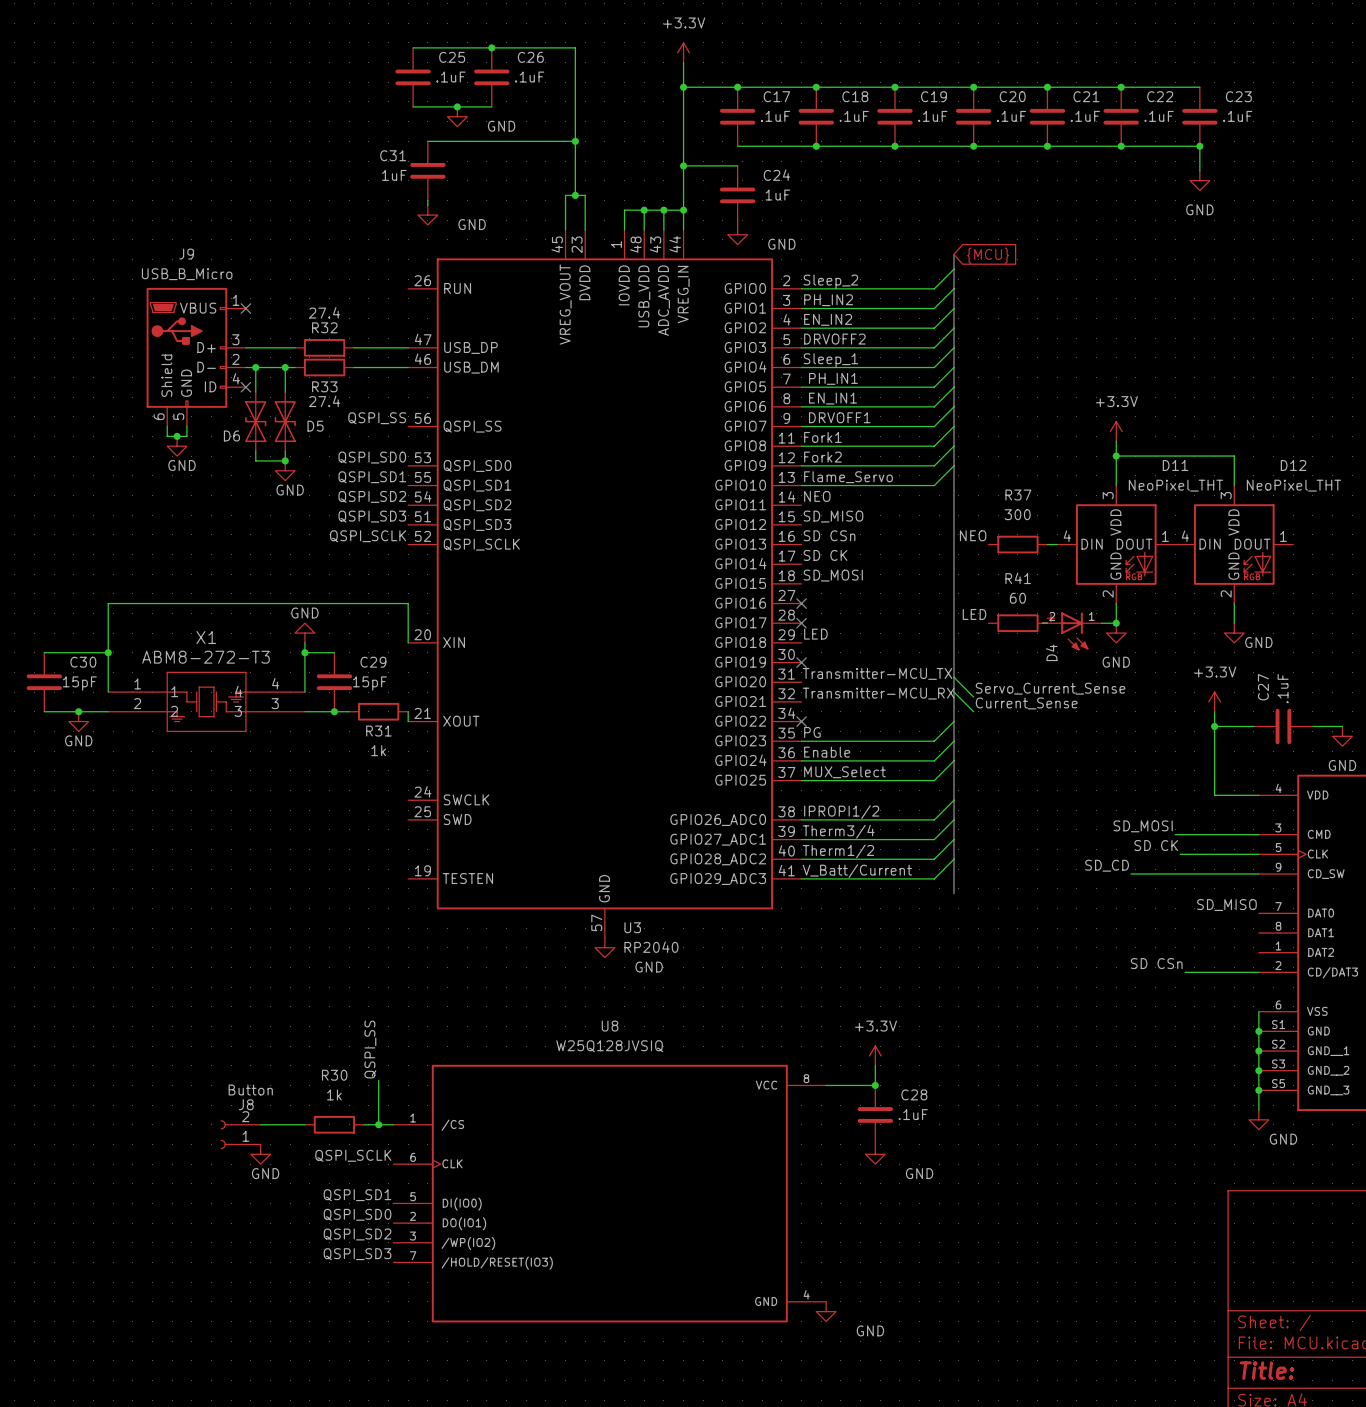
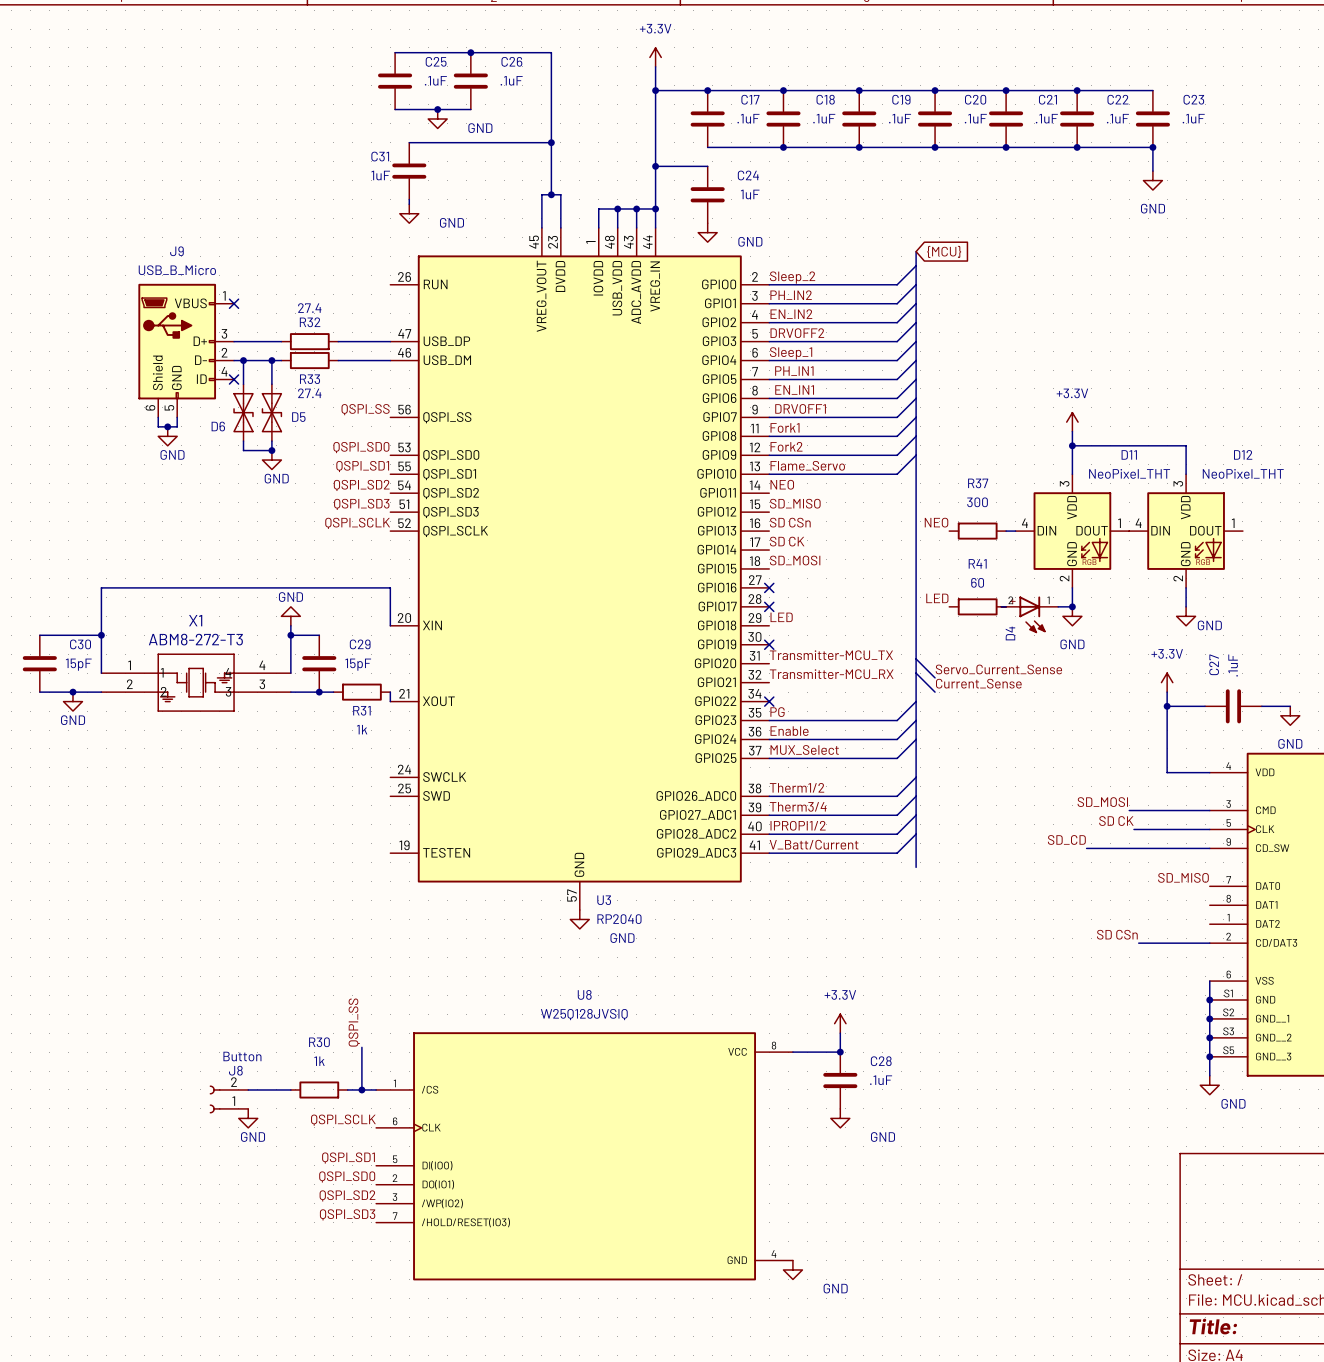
label: IPROPI1/2 (841, 812) -> Therm1/2 (797, 787)
label: Therm1/2 (838, 851) -> IPROPI1/2 (798, 825)

